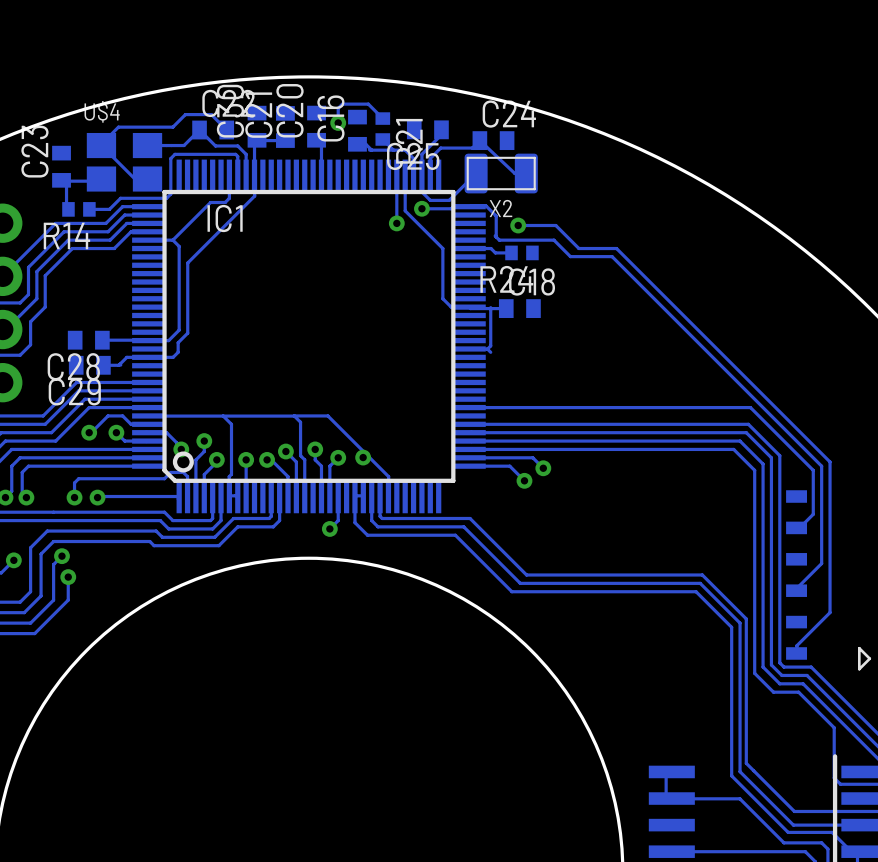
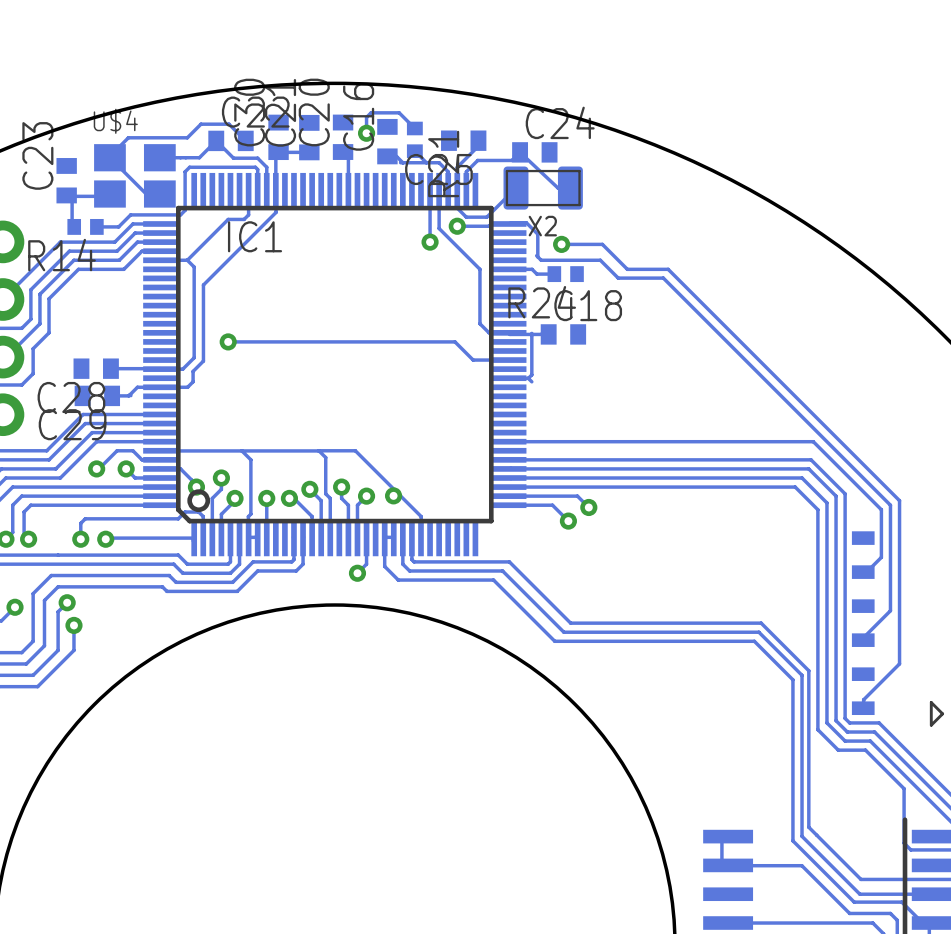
track: none -> (228, 341) (455, 341) (473, 360) (508, 360)
via: none -> (228, 341)

